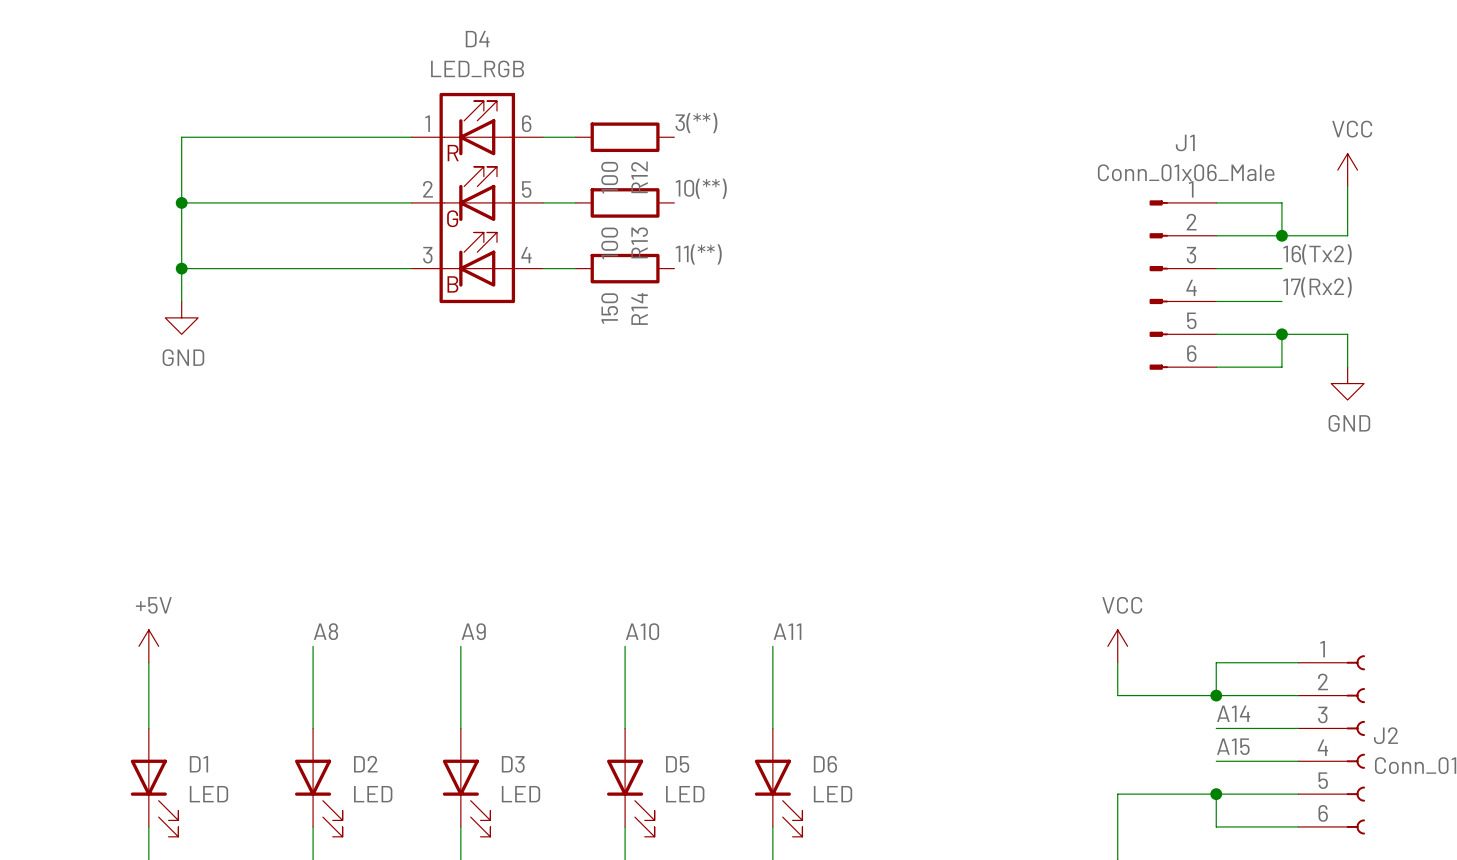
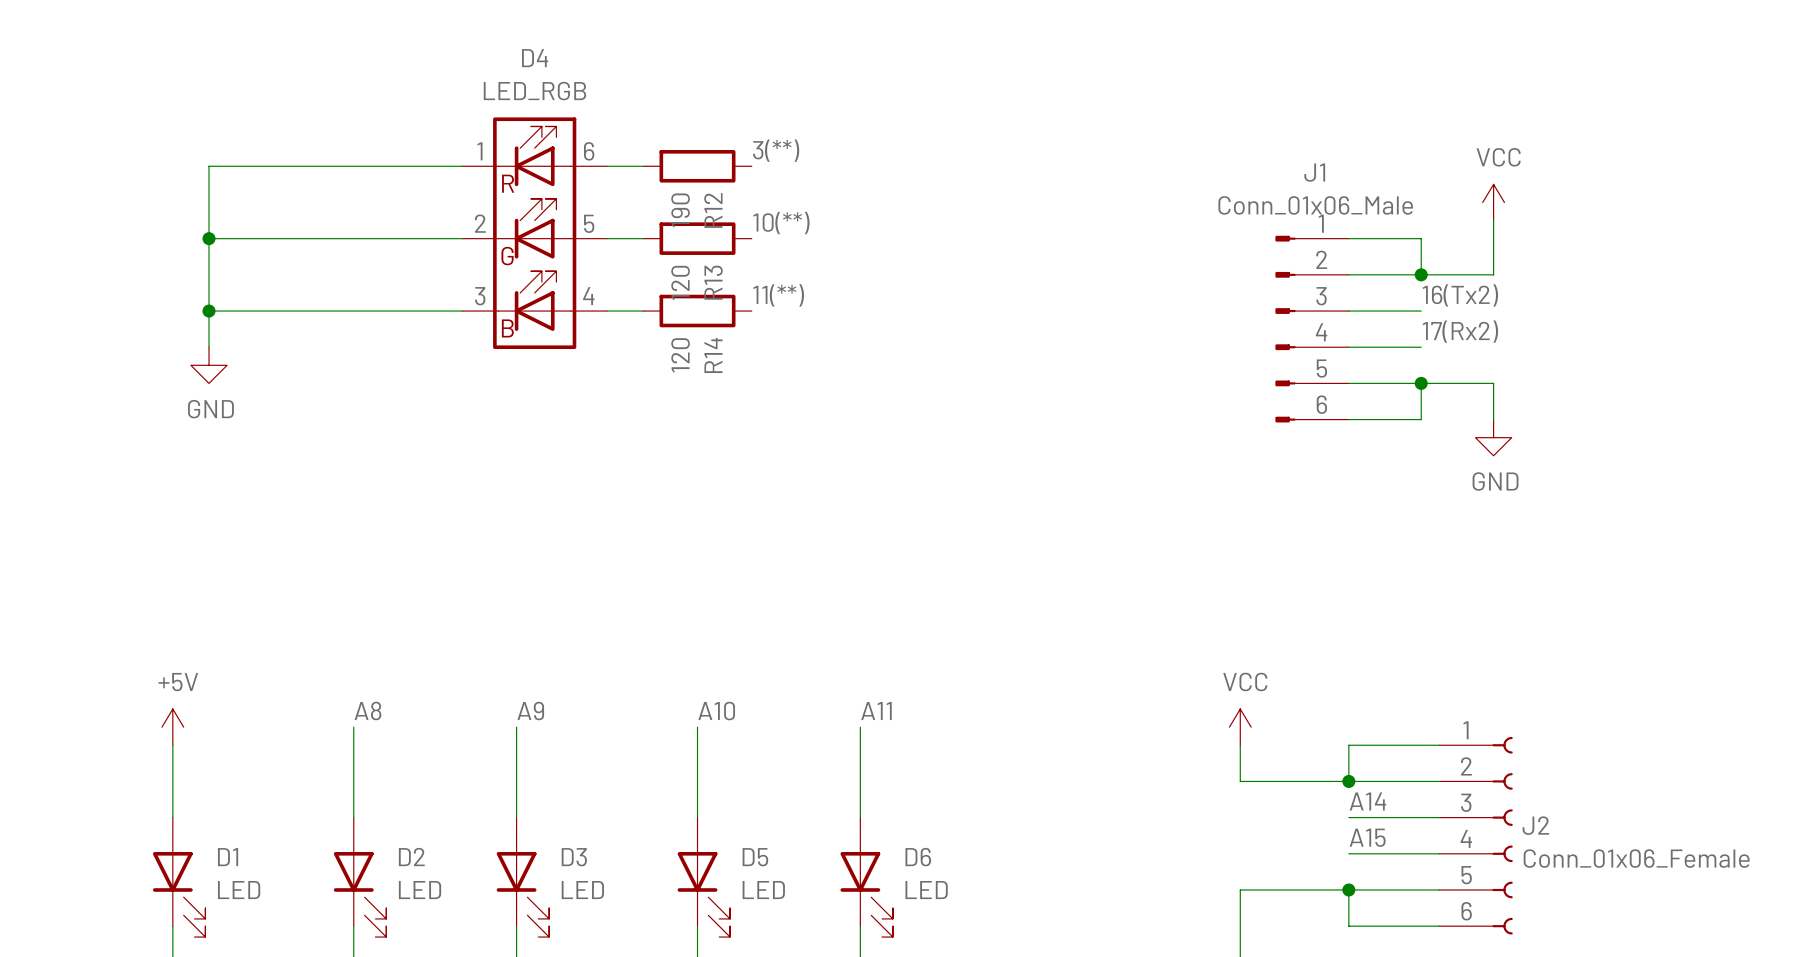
R12 value: 100 (609, 177) -> 190 (680, 210)
R13 value: 100 (609, 243) -> 120 (680, 282)
R14 value: 150 (609, 308) -> 120 (680, 355)

